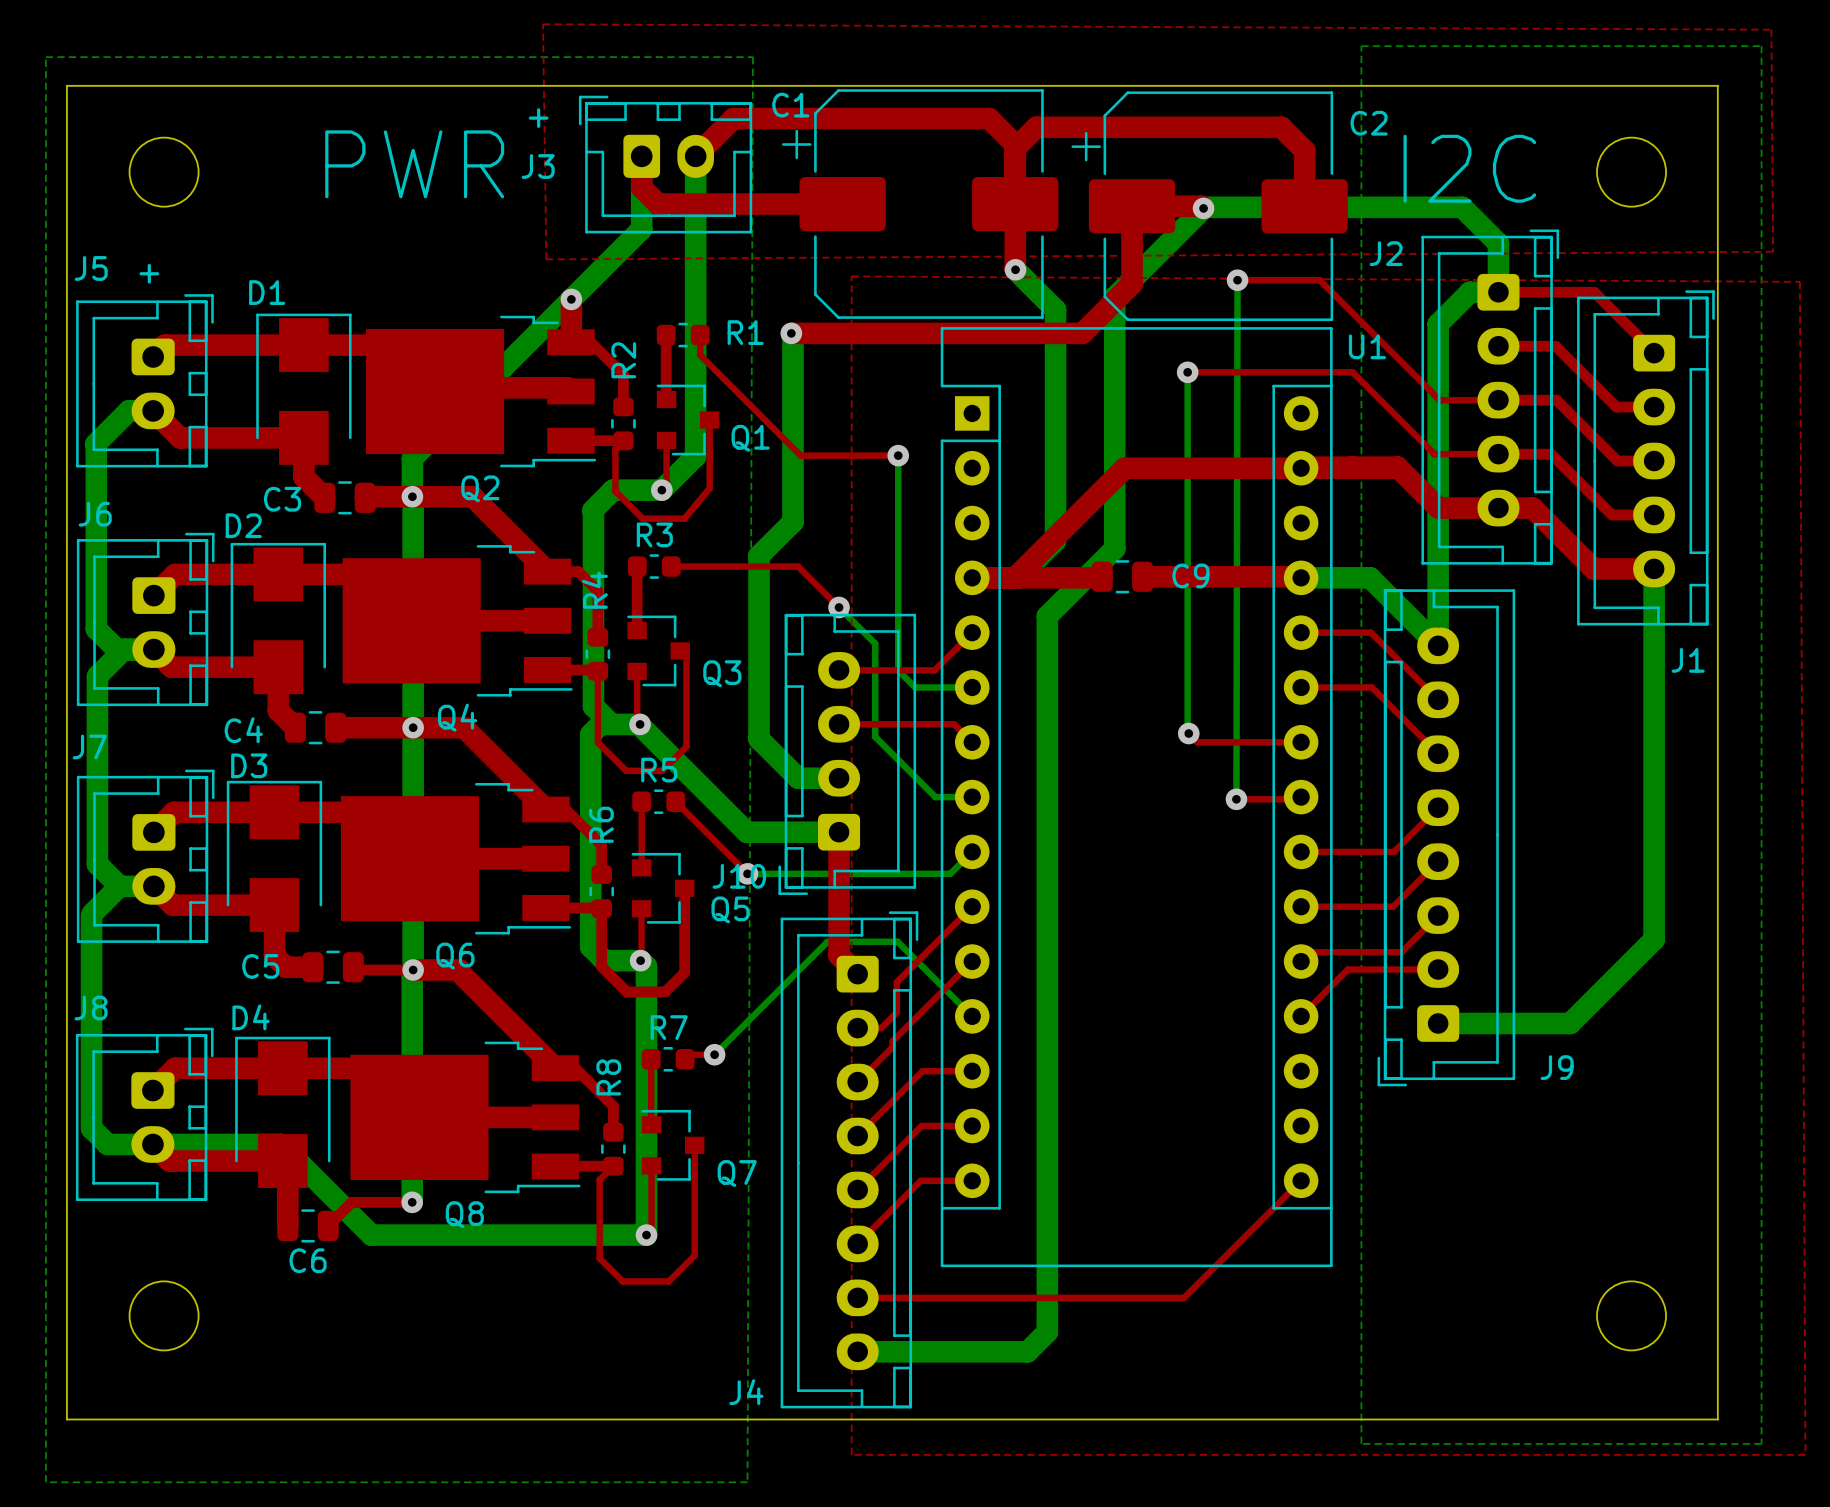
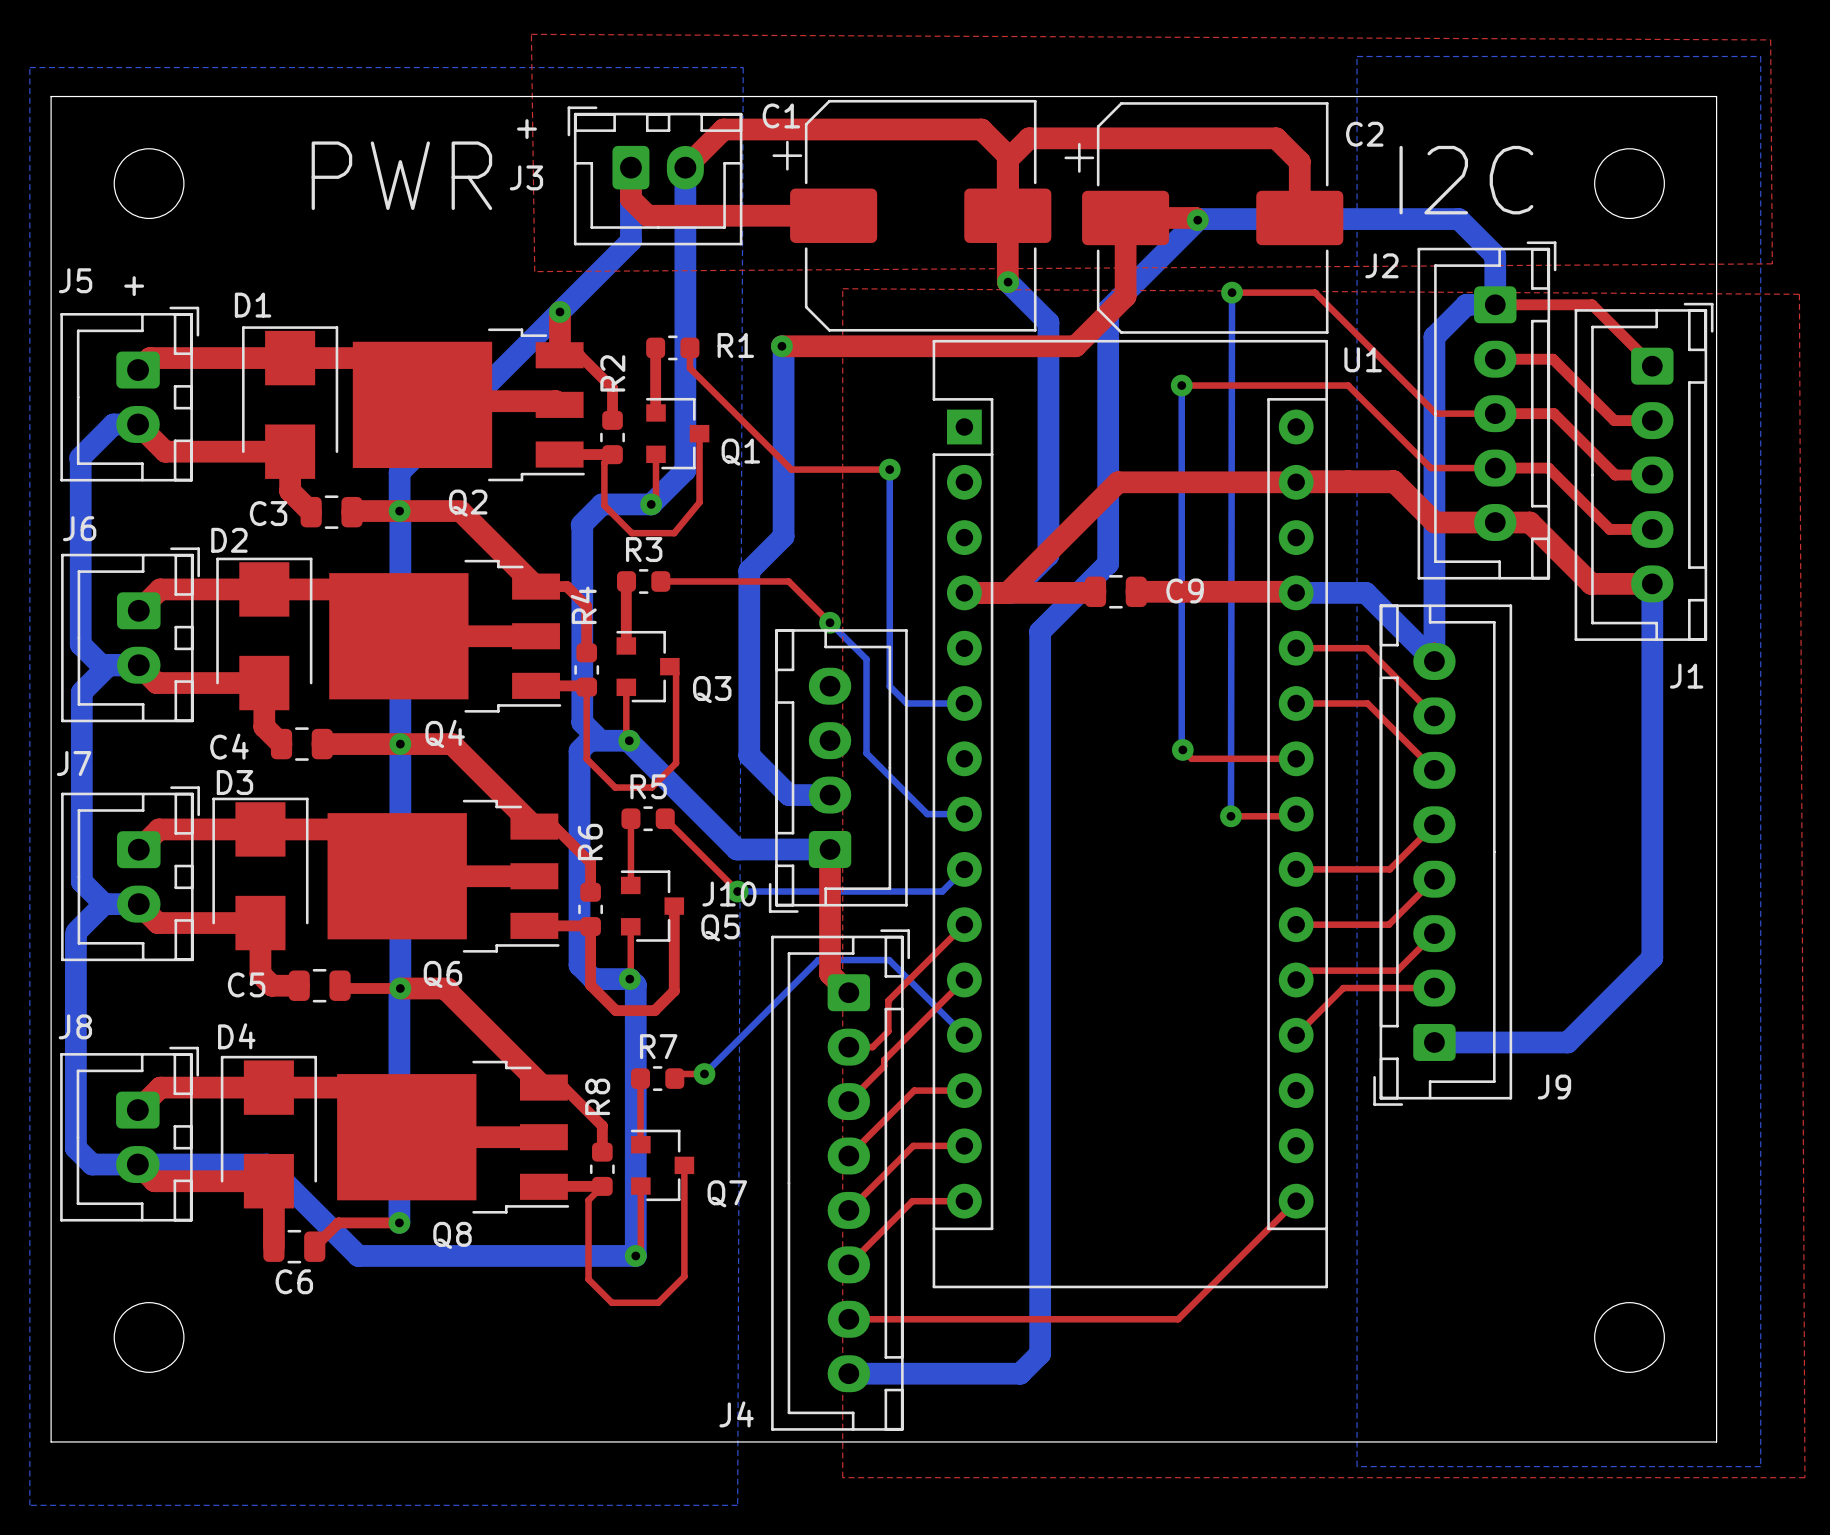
top track: (972, 632) (934, 670) (839, 670) -> none
top track: (839, 724) (954, 724) (972, 742) -> none

